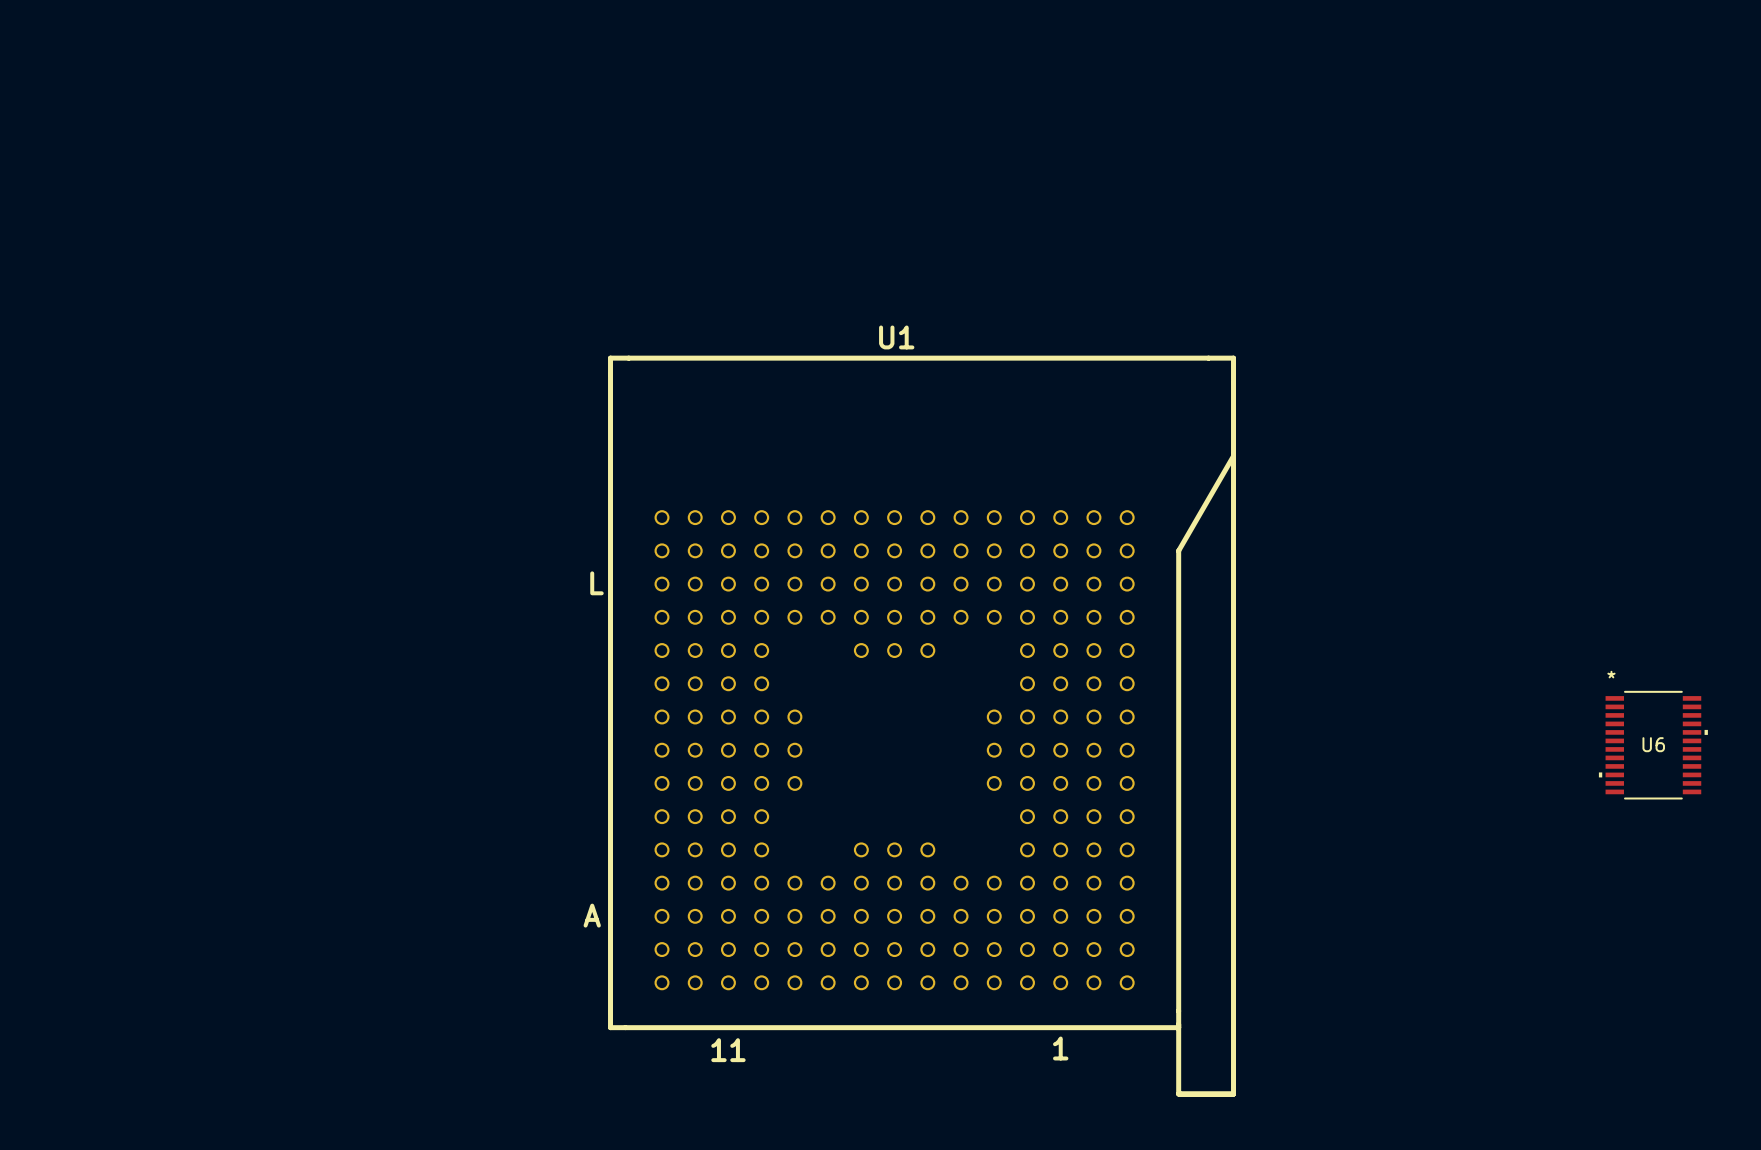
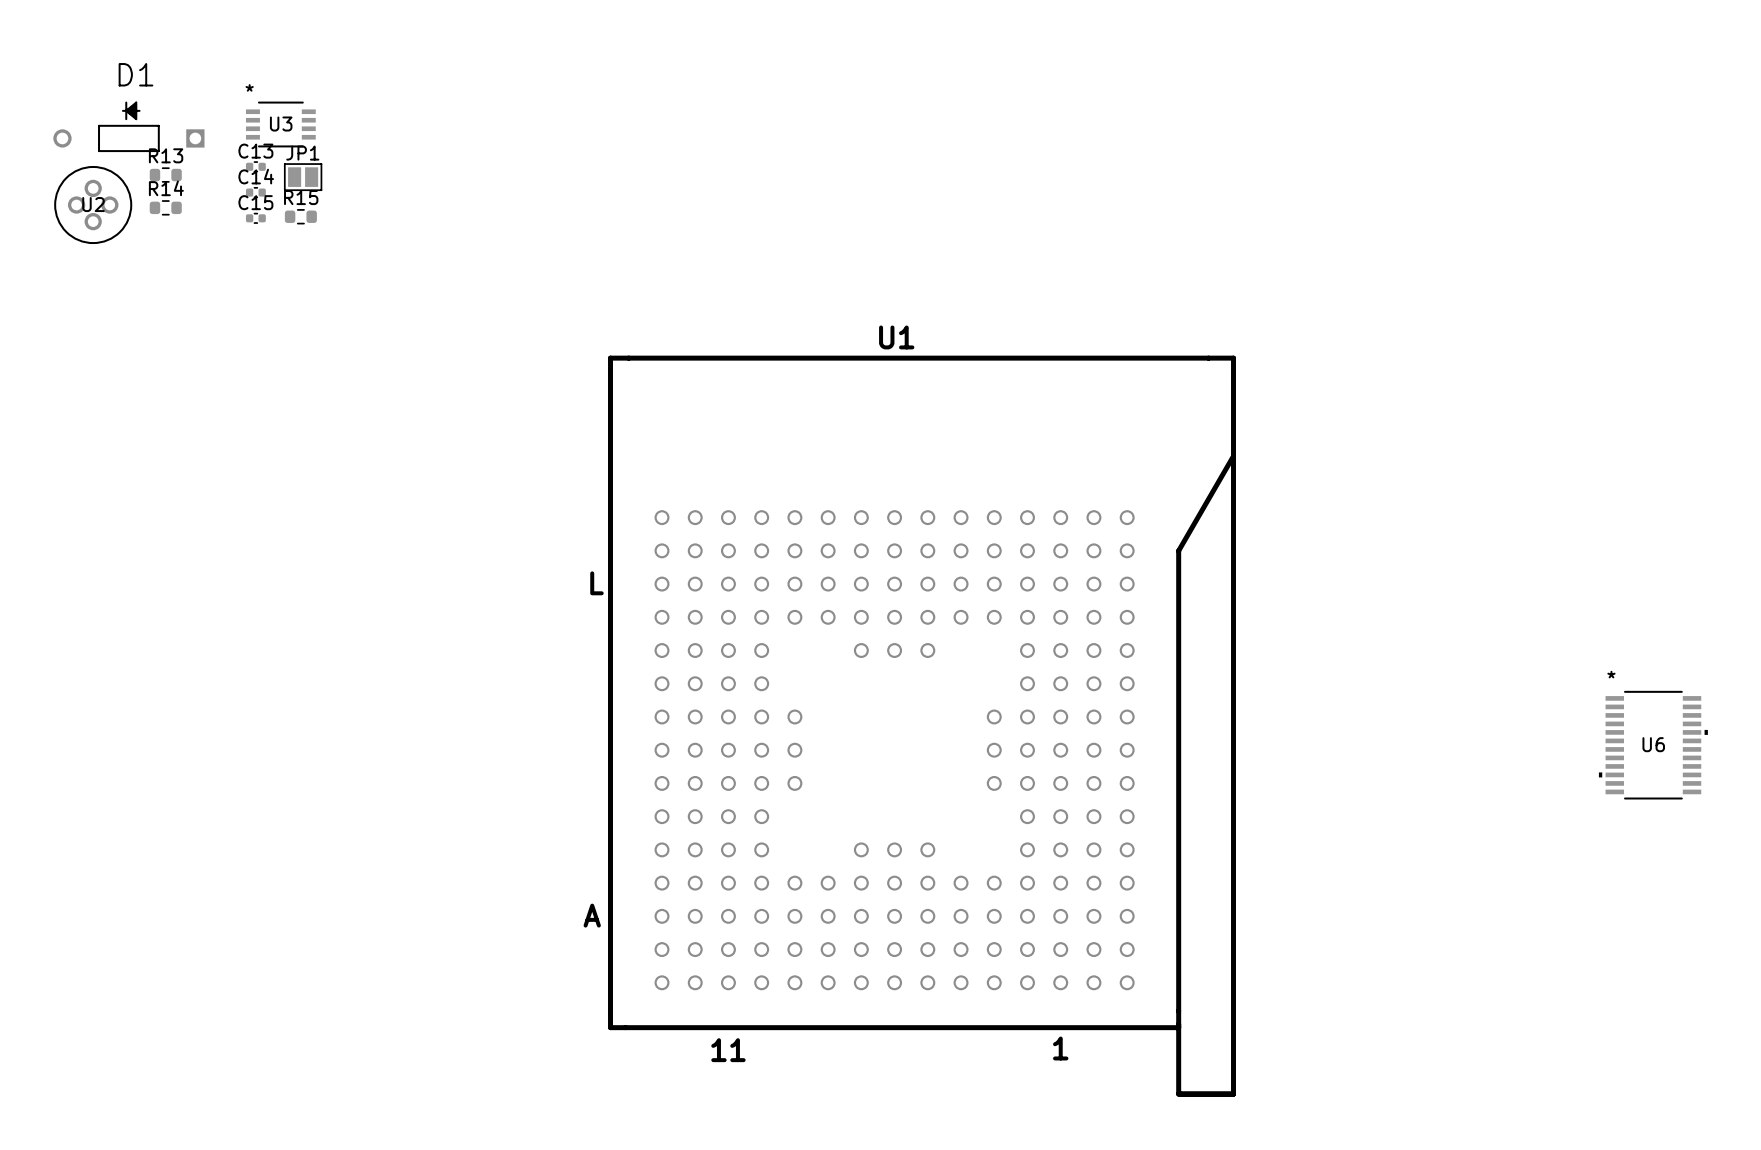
U3: none -> (280, 124)
D1: none -> (128, 126)
C13: none -> (255, 166)
R13: none -> (165, 175)
JP1: none -> (303, 177)
C14: none -> (255, 192)
U2: none -> (93, 205)
R14: none -> (165, 207)
R15: none -> (300, 216)
C15: none -> (255, 218)

